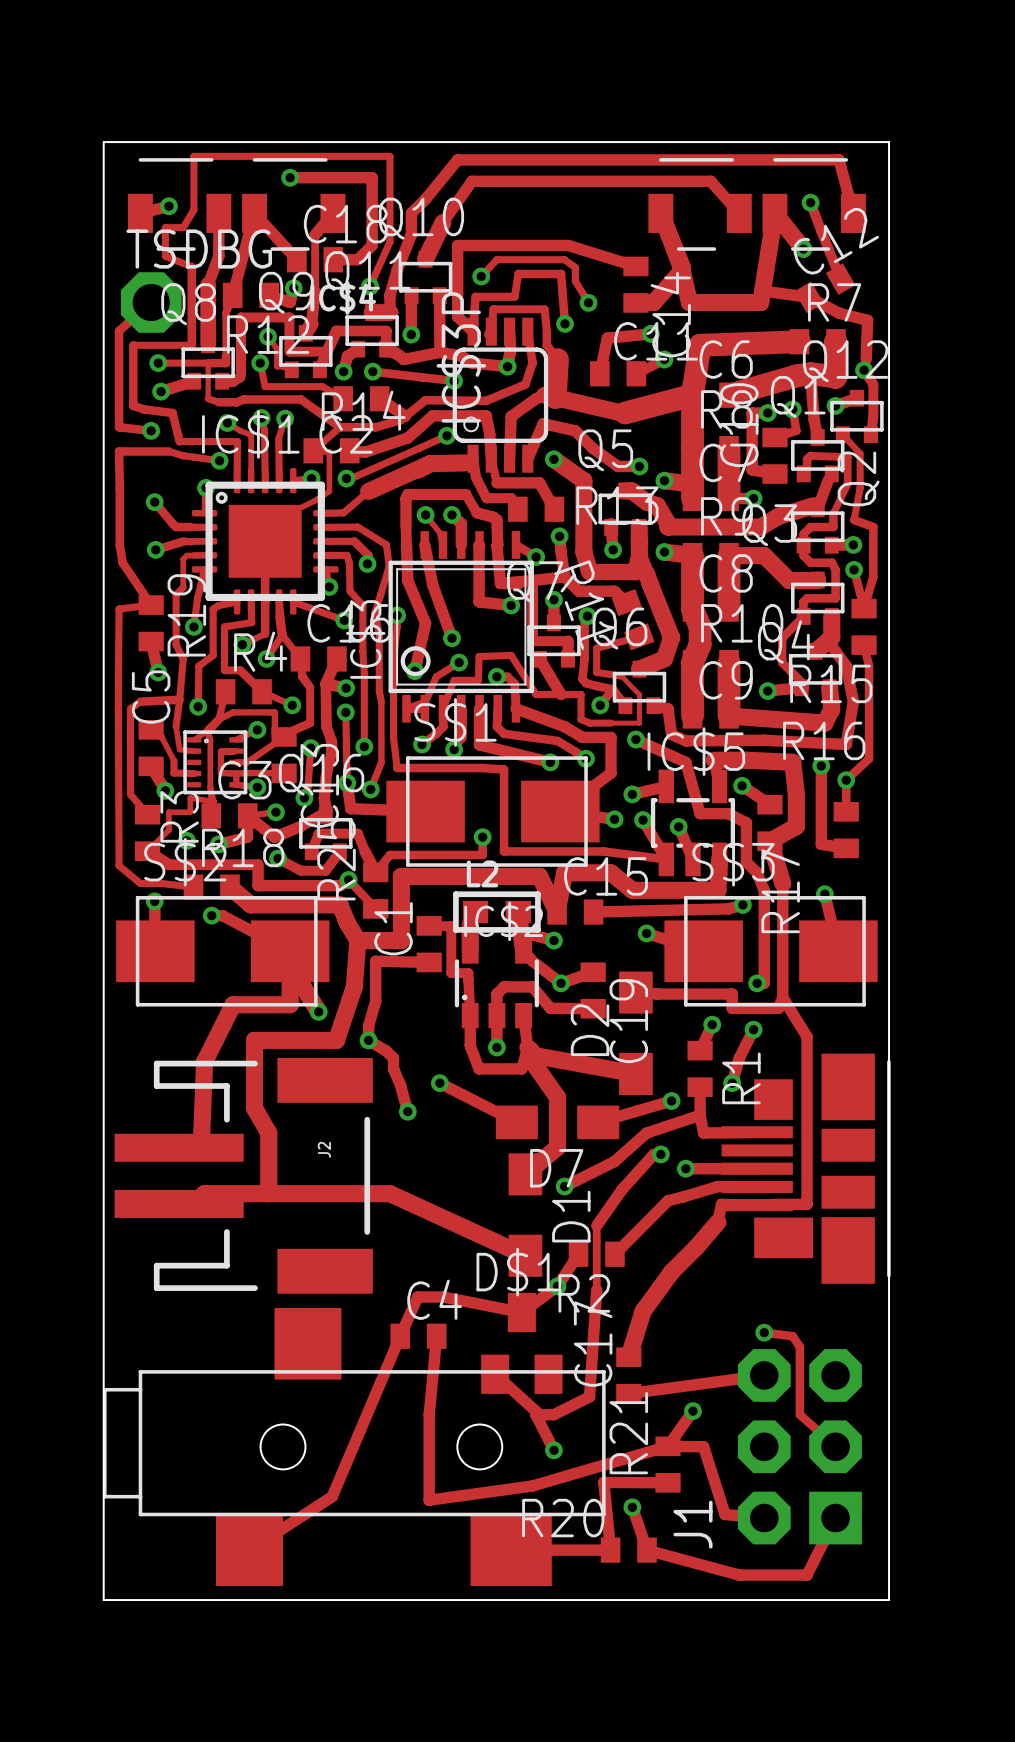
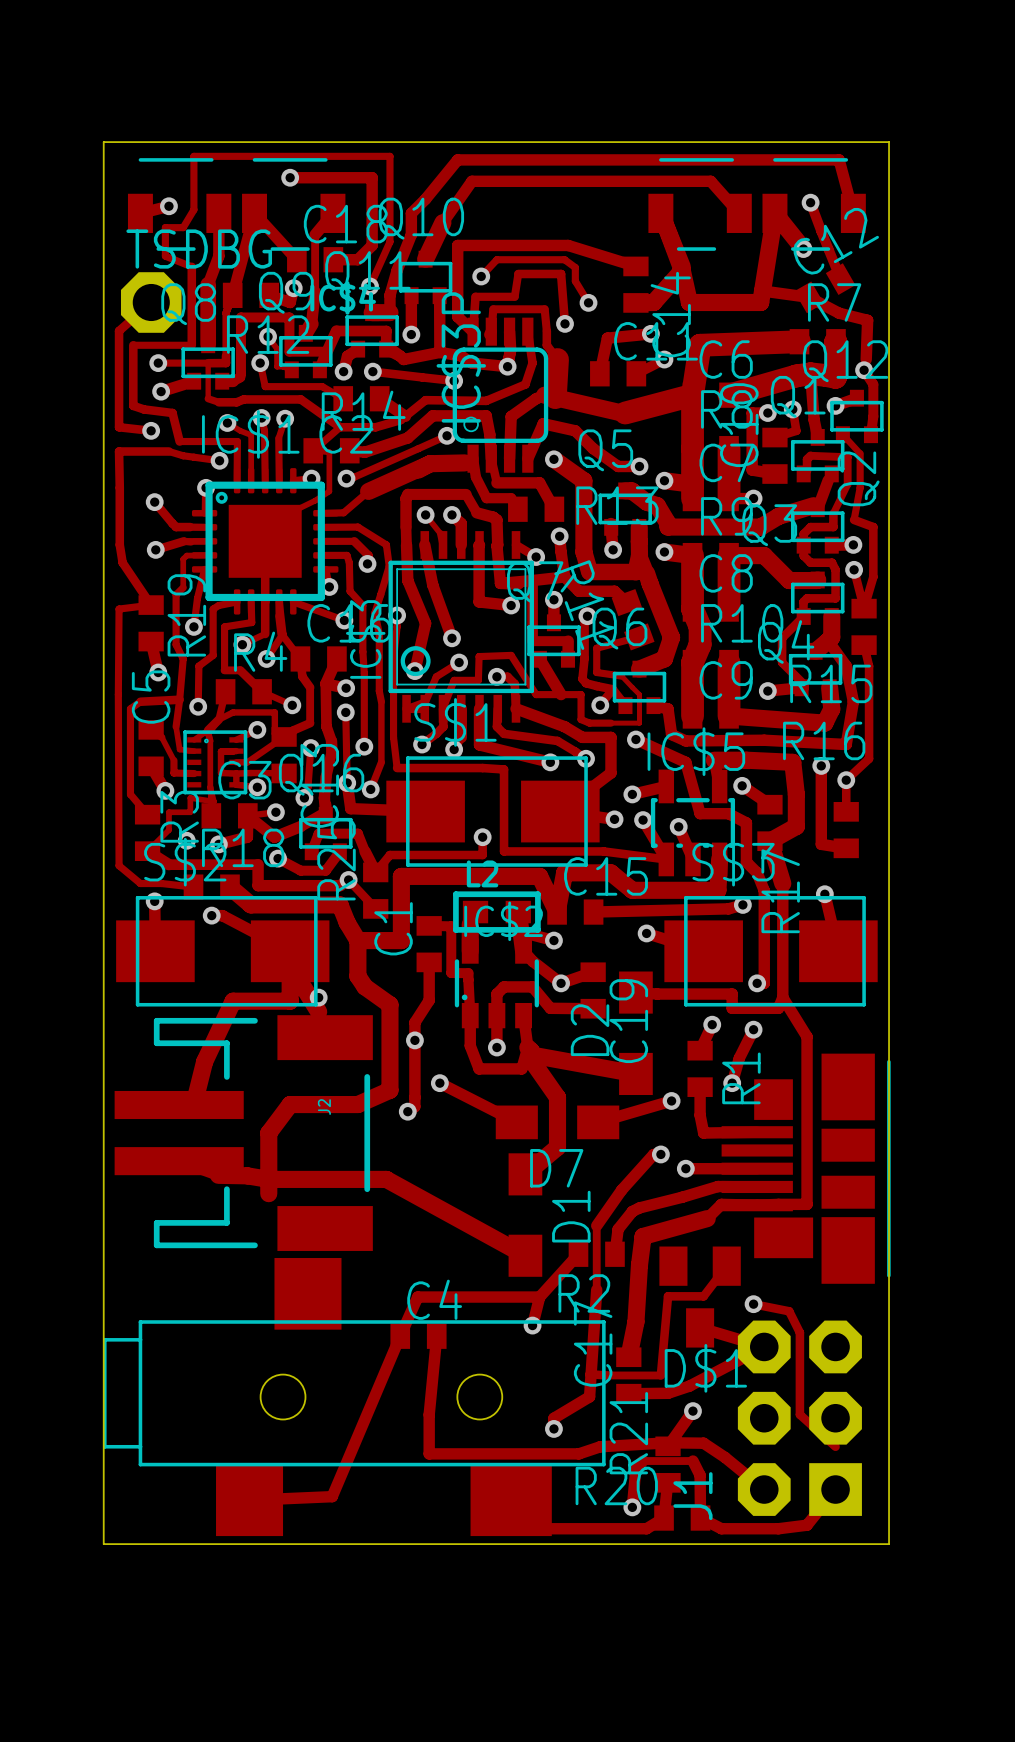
track: (357, 940) (354, 986) (336, 1040) (254, 1040) (254, 1108) (268, 1133) -> (357, 940) (357, 976) (365, 986) (389, 1004) (389, 1090) (357, 1104) (290, 1104) (268, 1133)
track: (429, 962) (375, 961) (375, 1001) (368, 1026) (368, 1040) (386, 1051) (393, 1058) (393, 1068) (407, 1111) -> (429, 962) (429, 1000) (414, 1022) (414, 1106) (407, 1111)
track: (290, 1001) (290, 1004) (233, 1004) (204, 1061) (201, 1150) (179, 1147) -> (290, 1001) (233, 1001) (204, 1061) (193, 1104) (179, 1105)
via position: (318, 1011) -> (318, 997)
via: (368, 1040) -> none
via: none -> (414, 1040)
track: (700, 1115) (646, 1133) (614, 1161) (564, 1186) -> none
J2 position: (243, 1175) -> (243, 1133)
via: (564, 1186) -> none
track: (668, 1200) (614, 1254) -> (668, 1200) (632, 1211) (618, 1229) (614, 1254)
track: (179, 1203) (193, 1203) (204, 1193) (389, 1193) (525, 1255) -> (179, 1161) (218, 1175) (247, 1175) (268, 1179) (386, 1179) (525, 1255)
track: (721, 1204) (717, 1222) (671, 1272) (643, 1311) (628, 1357) -> (721, 1204) (707, 1218) (643, 1236) (635, 1322) (628, 1357)
track: (578, 1254) (557, 1286) (521, 1312) (443, 1297) -> (539, 1297) (443, 1297)
track: none -> (578, 1254) (539, 1297)
track: none -> (726, 1266) (703, 1296) (668, 1296) (660, 1375) (591, 1374)
via position: (557, 1286) -> (532, 1325)
track: none -> (539, 1297) (532, 1325)
track: (764, 1332) (792, 1336) (799, 1346) -> (753, 1304) (789, 1311) (799, 1332) (799, 1346)
via position: (764, 1332) -> (753, 1304)
D$1 rotation: 0° (521, 1343) -> 180° (700, 1297)
D$1 position: (521, 1343) -> (700, 1297)
track: (495, 1374) (539, 1414) (536, 1414) -> none
track: (764, 1375) (628, 1393) -> (700, 1327) (764, 1346) (689, 1386) (668, 1393) (628, 1393)
track: (589, 1396) (553, 1414) (536, 1414) -> (589, 1396) (553, 1418) (553, 1428)
track: (536, 1414) (553, 1450) -> none
part position: (354, 1446) -> (354, 1397)
J1 position: (799, 1446) -> (799, 1418)
via position: (553, 1450) -> (553, 1428)
track: (429, 1453) (429, 1500) (532, 1485) (668, 1446) (703, 1446) (725, 1514) (764, 1518) -> (429, 1453) (578, 1453) (600, 1446) (668, 1442) (703, 1443) (725, 1457) (764, 1489)
track: none -> (668, 1479) (664, 1518) (646, 1528) (543, 1528) (511, 1500)
track: (668, 1482) (603, 1482) (610, 1550) (511, 1550) -> none
track: (332, 1496) (249, 1550) -> (332, 1496) (249, 1500)
track: (632, 1507) (647, 1550) (739, 1575) (807, 1575) (835, 1518) -> (632, 1507) (635, 1468) (643, 1461) (692, 1461) (700, 1475) (700, 1518) (721, 1528) (778, 1528) (807, 1525) (835, 1489)
board edge: (103, 1544) (103, 1600) (889, 1600) (889, 1544) -> (103, 1544) (889, 1544)
R20 position: (628, 1550) -> (682, 1518)

